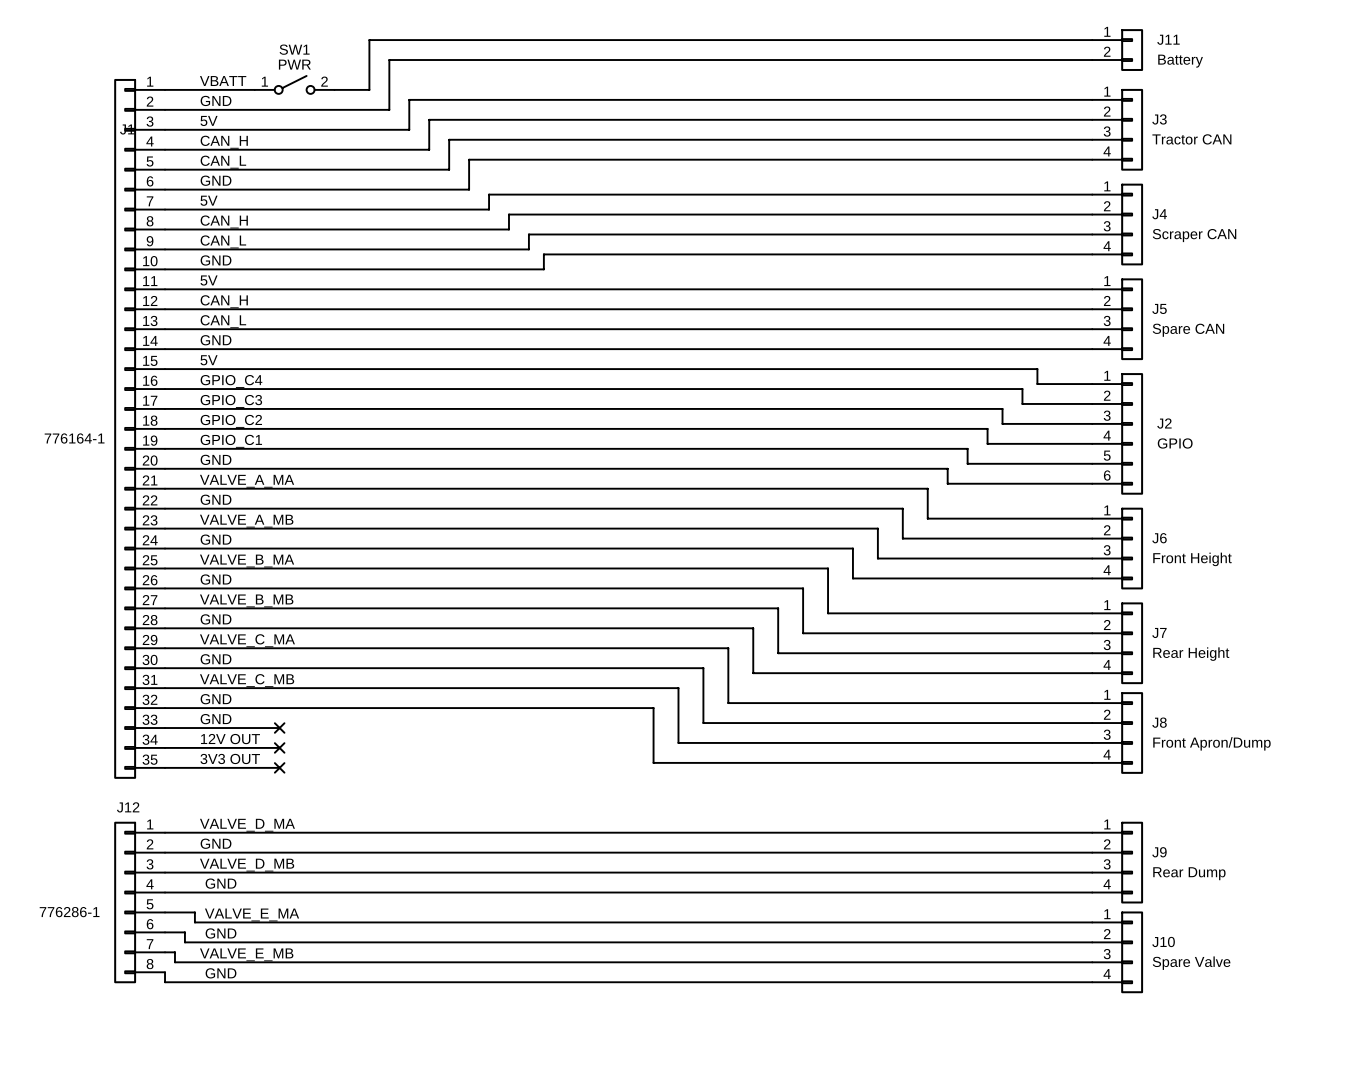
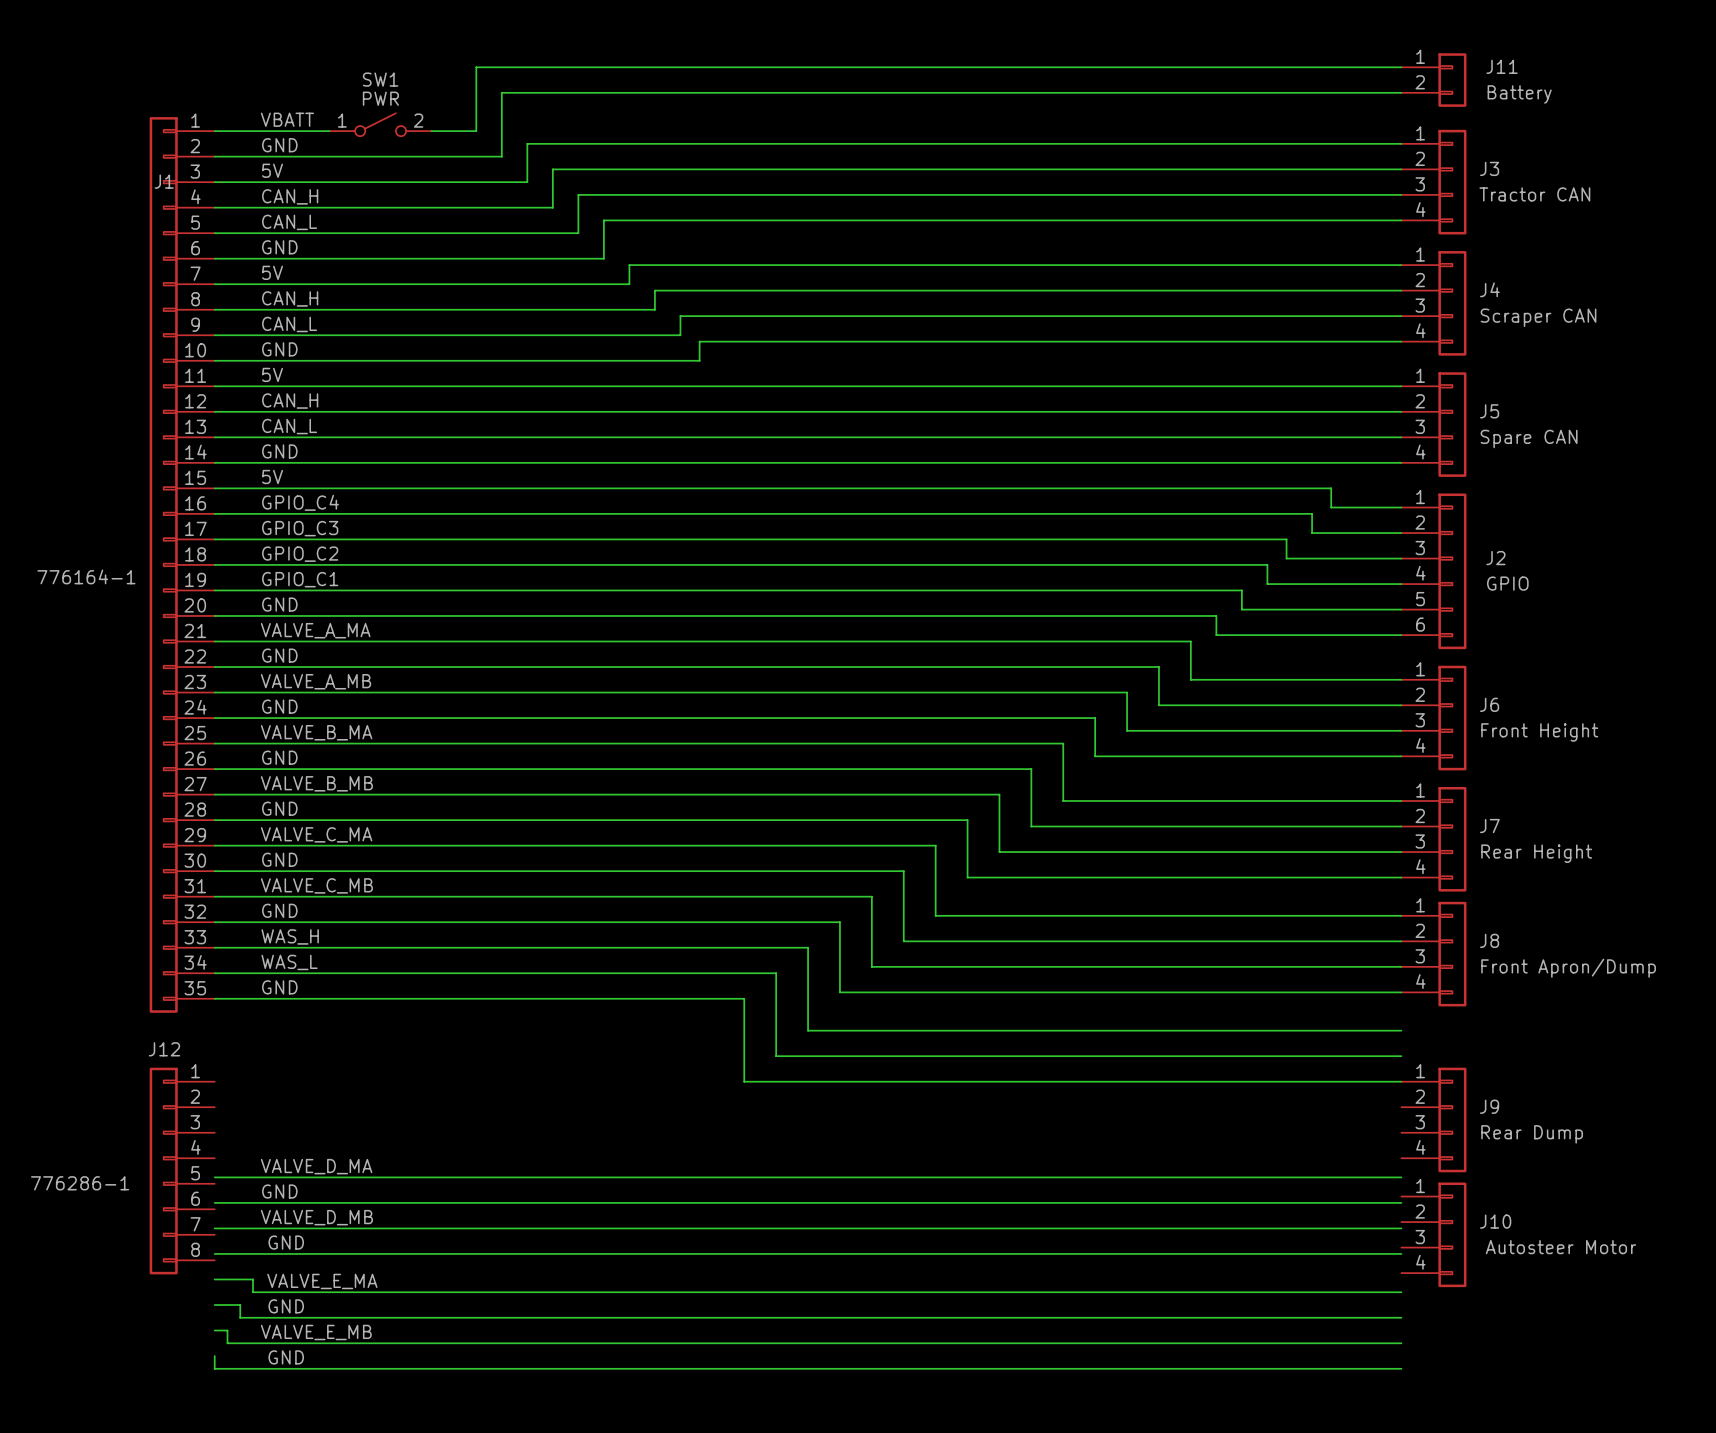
label: GND (216, 719) -> WAS_H (290, 936)
wire: none -> (361, 947) (808, 947) (808, 1030) (1401, 1030)
no-connect mark: (279, 728) -> none
label: 12V OUT (230, 739) -> WAS_L (289, 962)
wire: none -> (361, 973) (776, 973) (776, 1056) (1401, 1056)
no-connect mark: (279, 747) -> none
label: 3V3 OUT (230, 758) -> GND (279, 987)
no-connect mark: (279, 767) -> none
label position: VALVE_D_MA (247, 825) -> VALVE_D_MA (316, 1166)
wire: (165, 832) (578, 832) -> (361, 998) (744, 998) (744, 1081)
label: GND (216, 843) -> none
wire: (165, 852) (1092, 852) -> (214, 1202) (1401, 1202)
label position: VALVE_D_MB (247, 865) -> VALVE_D_MB (316, 1217)
wire: (165, 872) (1092, 872) -> (214, 1228) (1401, 1228)
label: GND (221, 883) -> none
wire: (165, 892) (1092, 892) -> (214, 1253) (1401, 1253)
wire: none -> (214, 1177) (1401, 1177)
wire: (165, 912) (194, 912) (194, 922) (1092, 922) -> (214, 1279) (253, 1279) (253, 1292) (1401, 1292)
label position: VALVE_E_MA (252, 914) -> VALVE_E_MA (322, 1281)
wire: (165, 932) (184, 932) (184, 942) (1092, 942) -> (214, 1305) (240, 1305) (240, 1317) (1401, 1317)
label position: GND (221, 933) -> GND (279, 1191)
wire: (165, 952) (174, 952) (174, 962) (1092, 962) -> (214, 1330) (227, 1330) (227, 1343) (1401, 1343)
label position: VALVE_E_MB (246, 954) -> VALVE_E_MB (316, 1332)
J10 value: Spare Valve (1191, 963) -> Autosteer Motor (1560, 1247)
wire: (165, 972) (165, 982) (1092, 982) -> (214, 1356) (214, 1368) (1401, 1368)
label position: GND (221, 973) -> GND (286, 1242)
label: none -> GND (286, 1306)
label: none -> GND (286, 1357)

